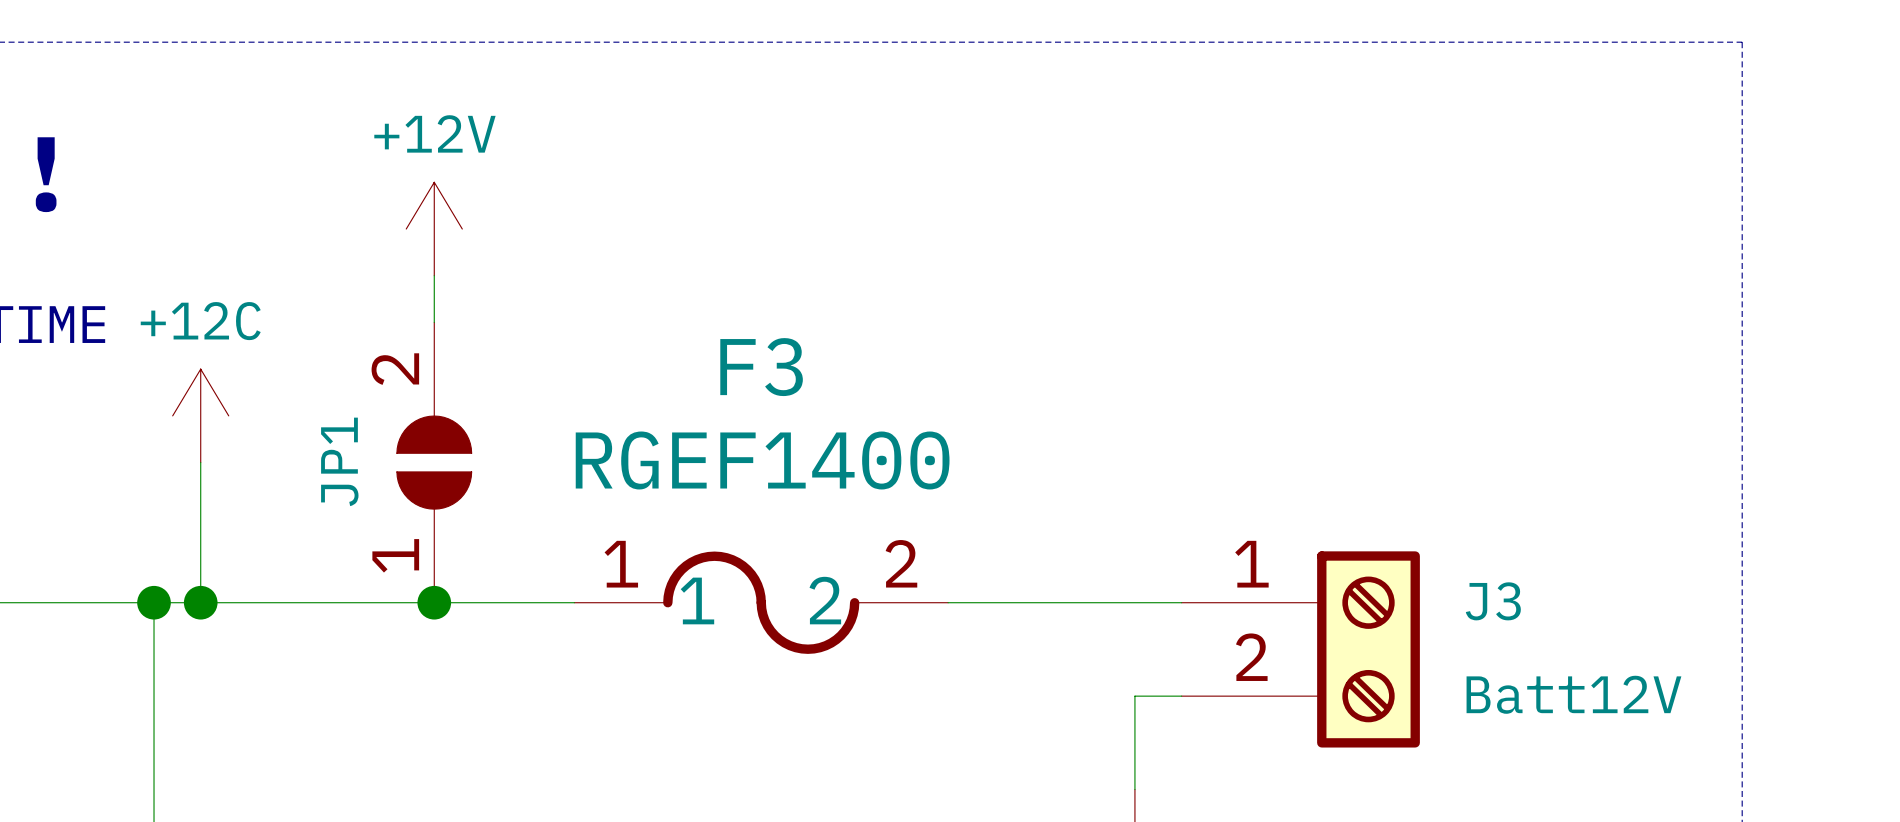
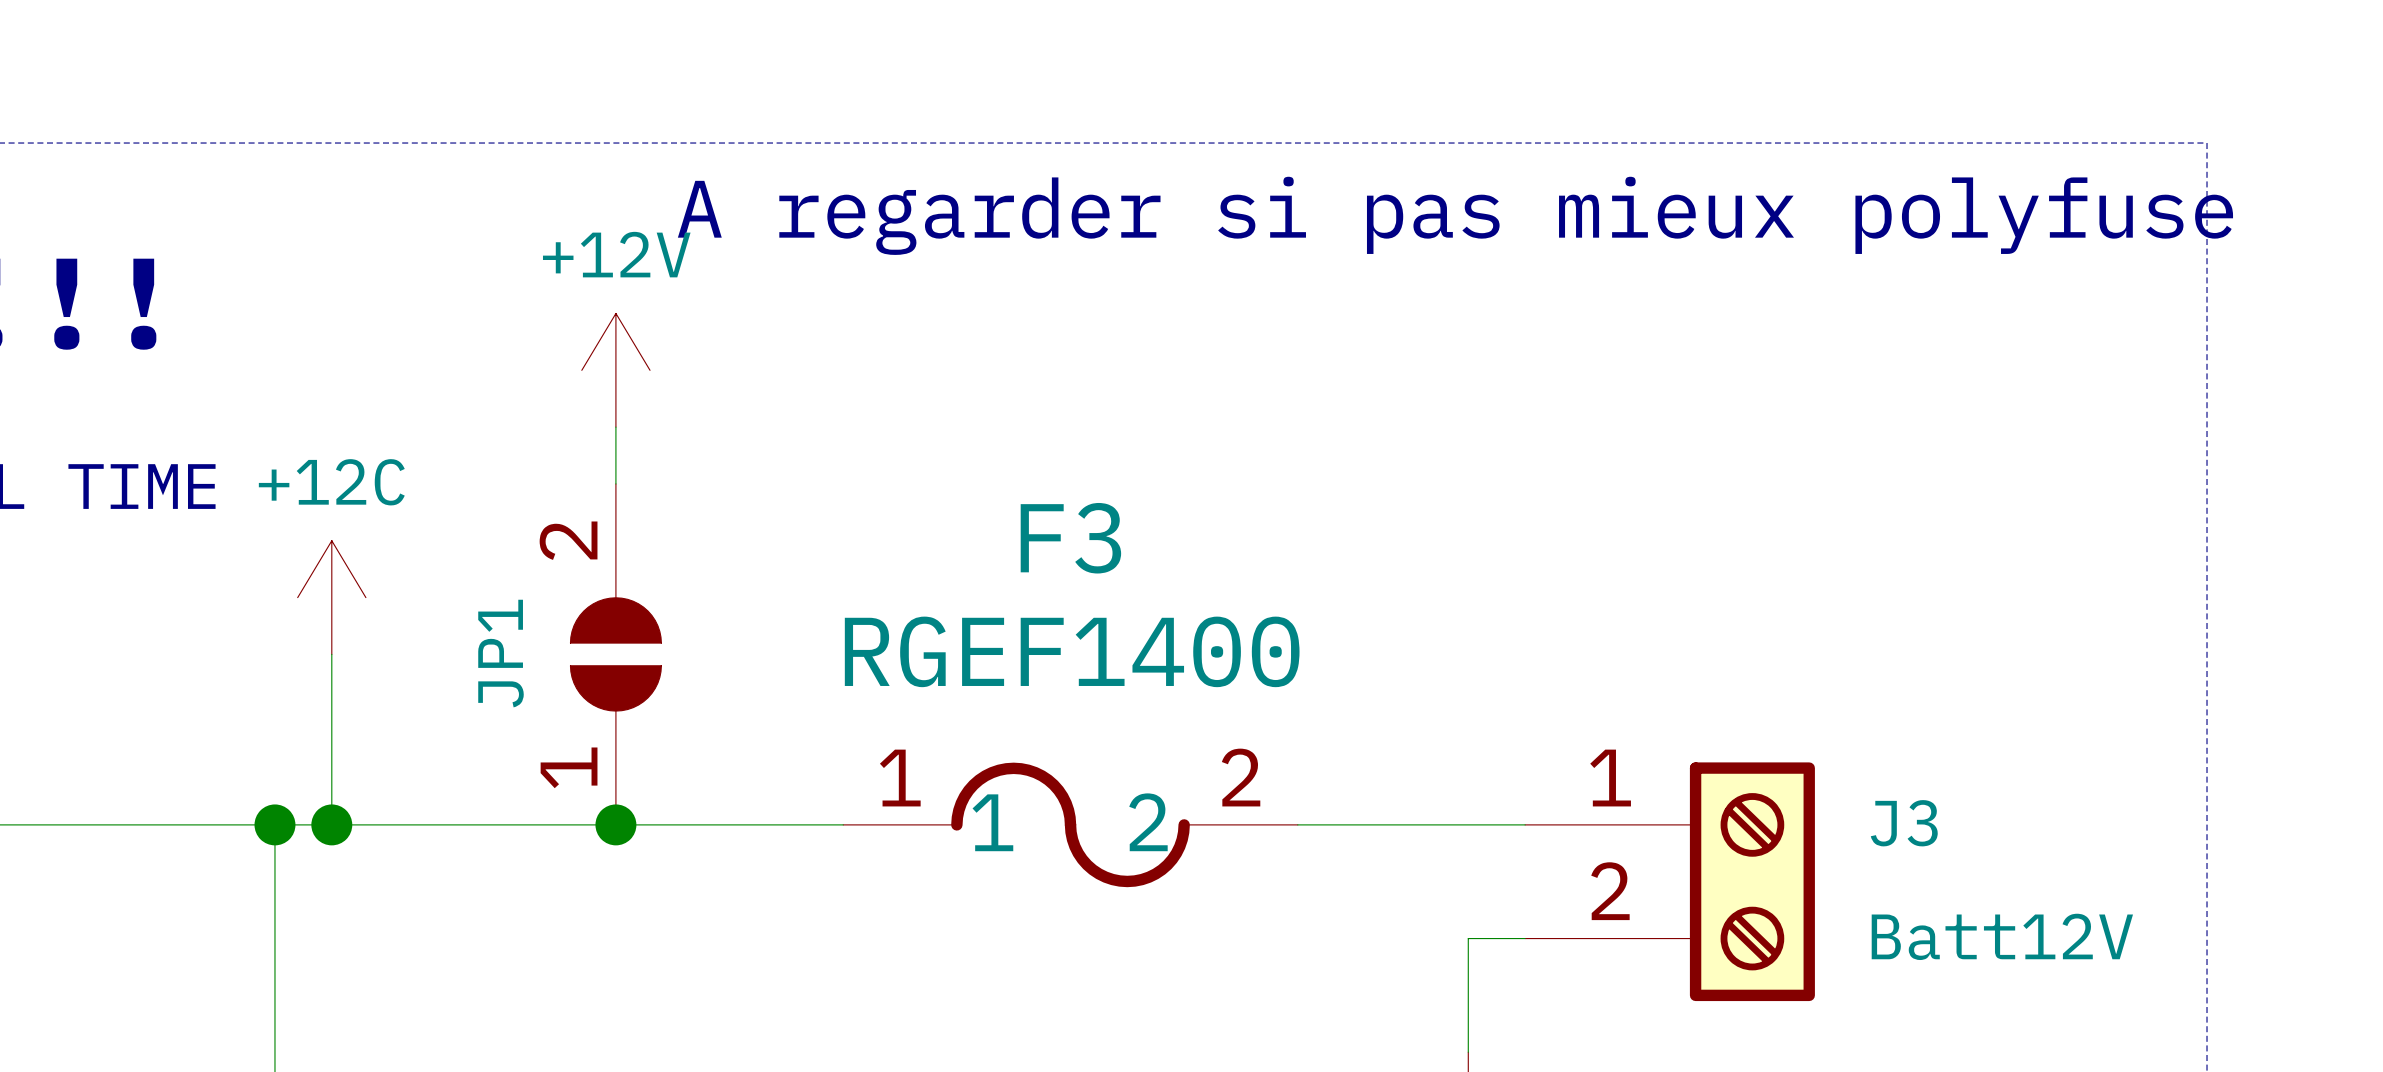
text: none -> A regarder si pas mieux polyfuse (1455, 215)
F3 position: (761, 602) -> (1070, 824)

